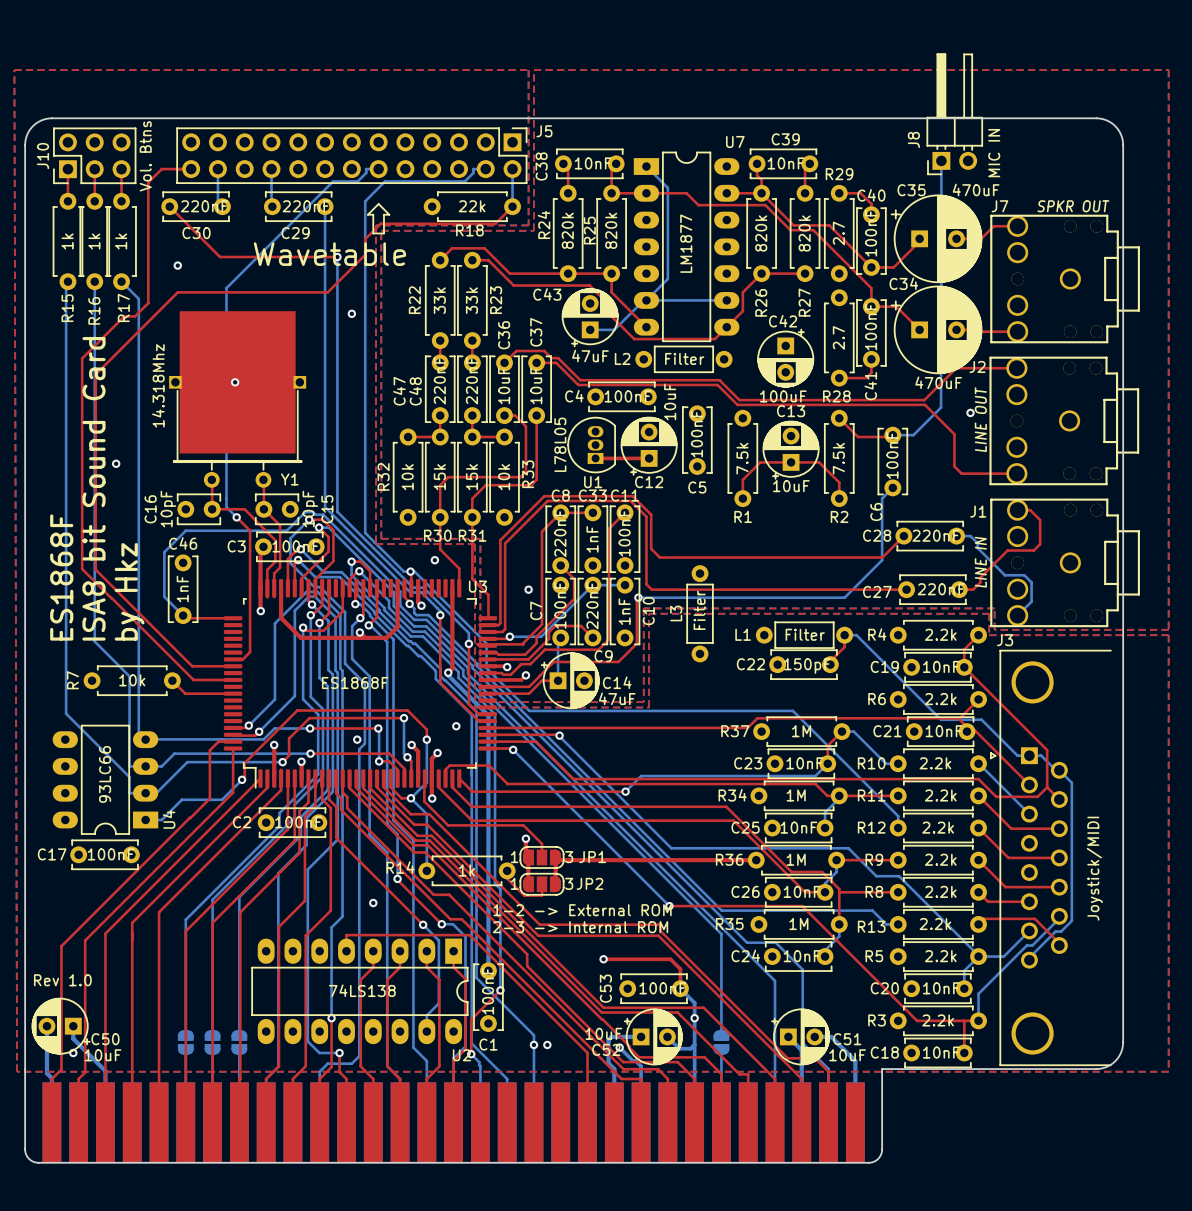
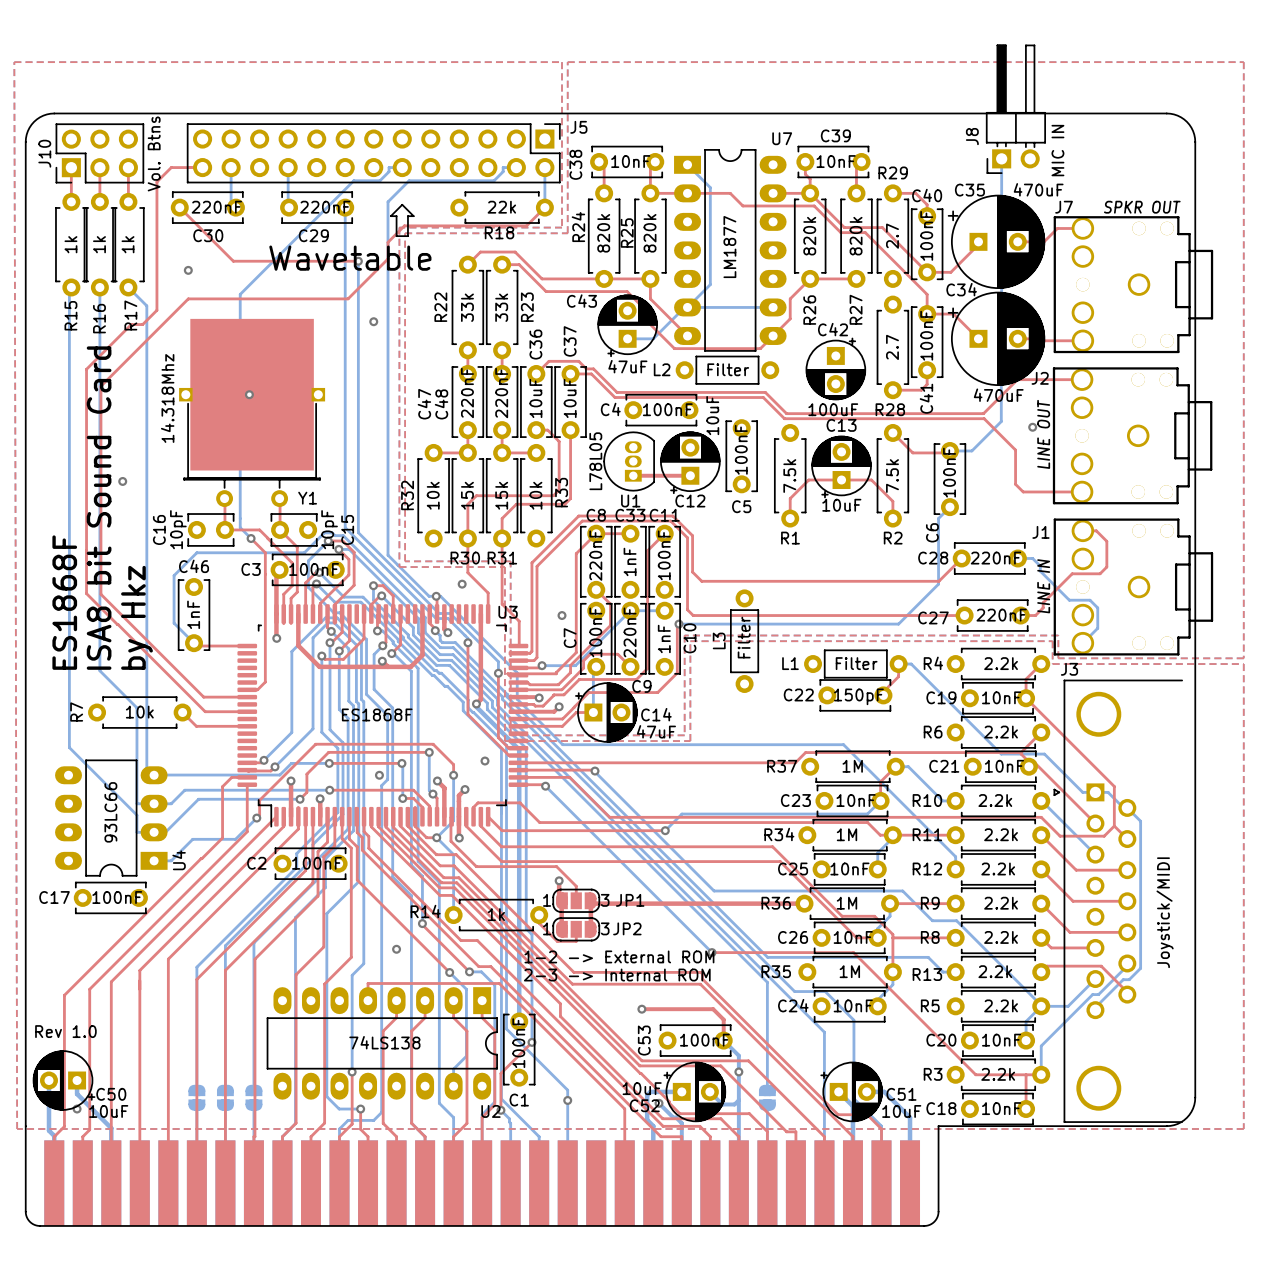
via: (547, 1044) -> none

